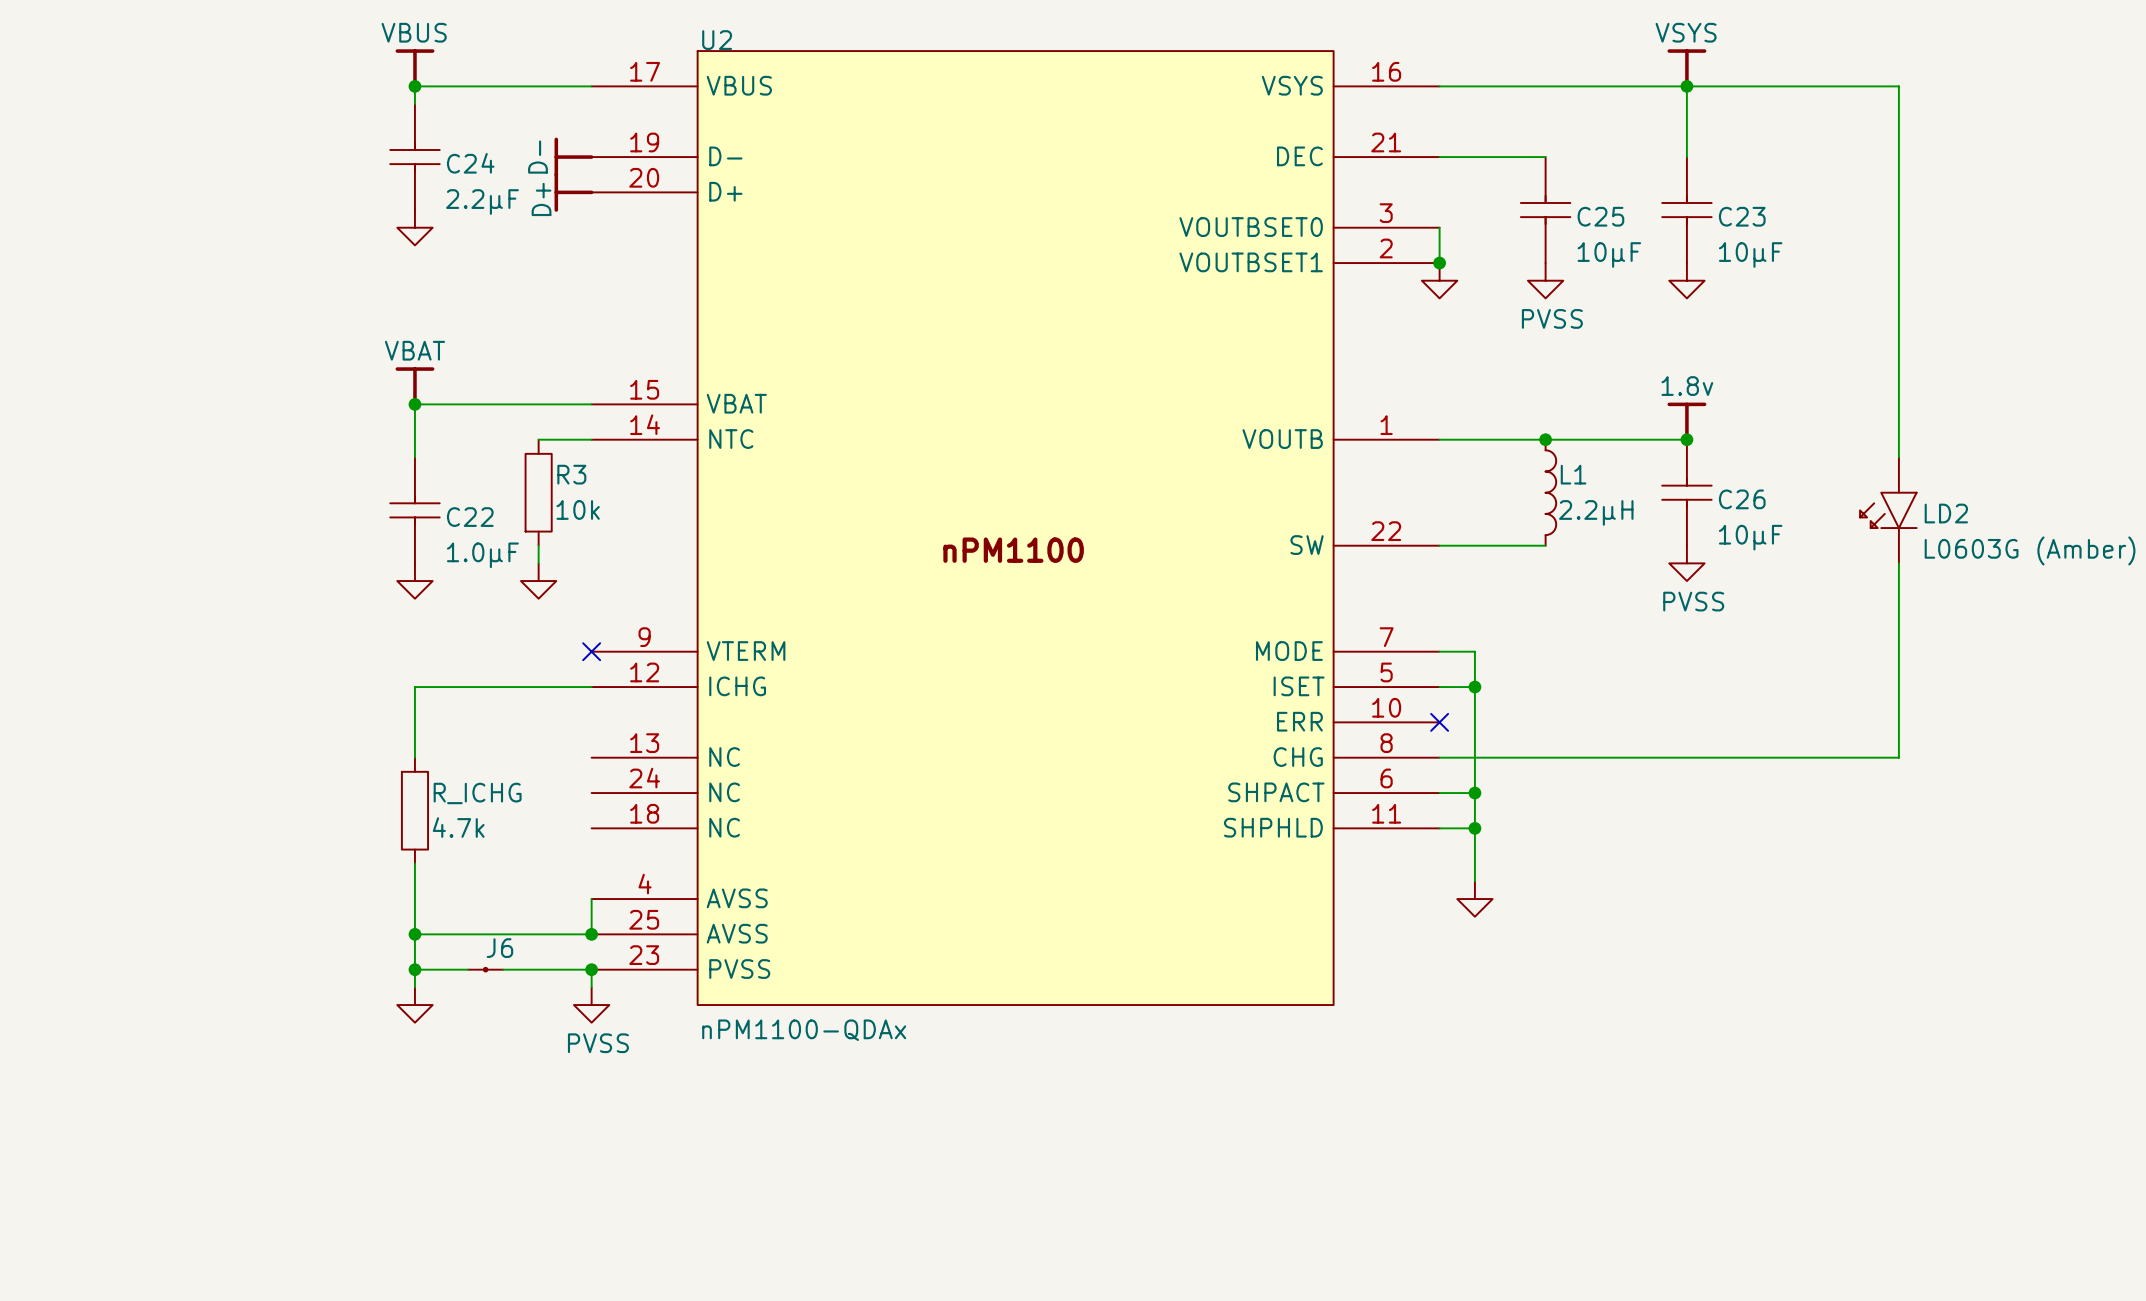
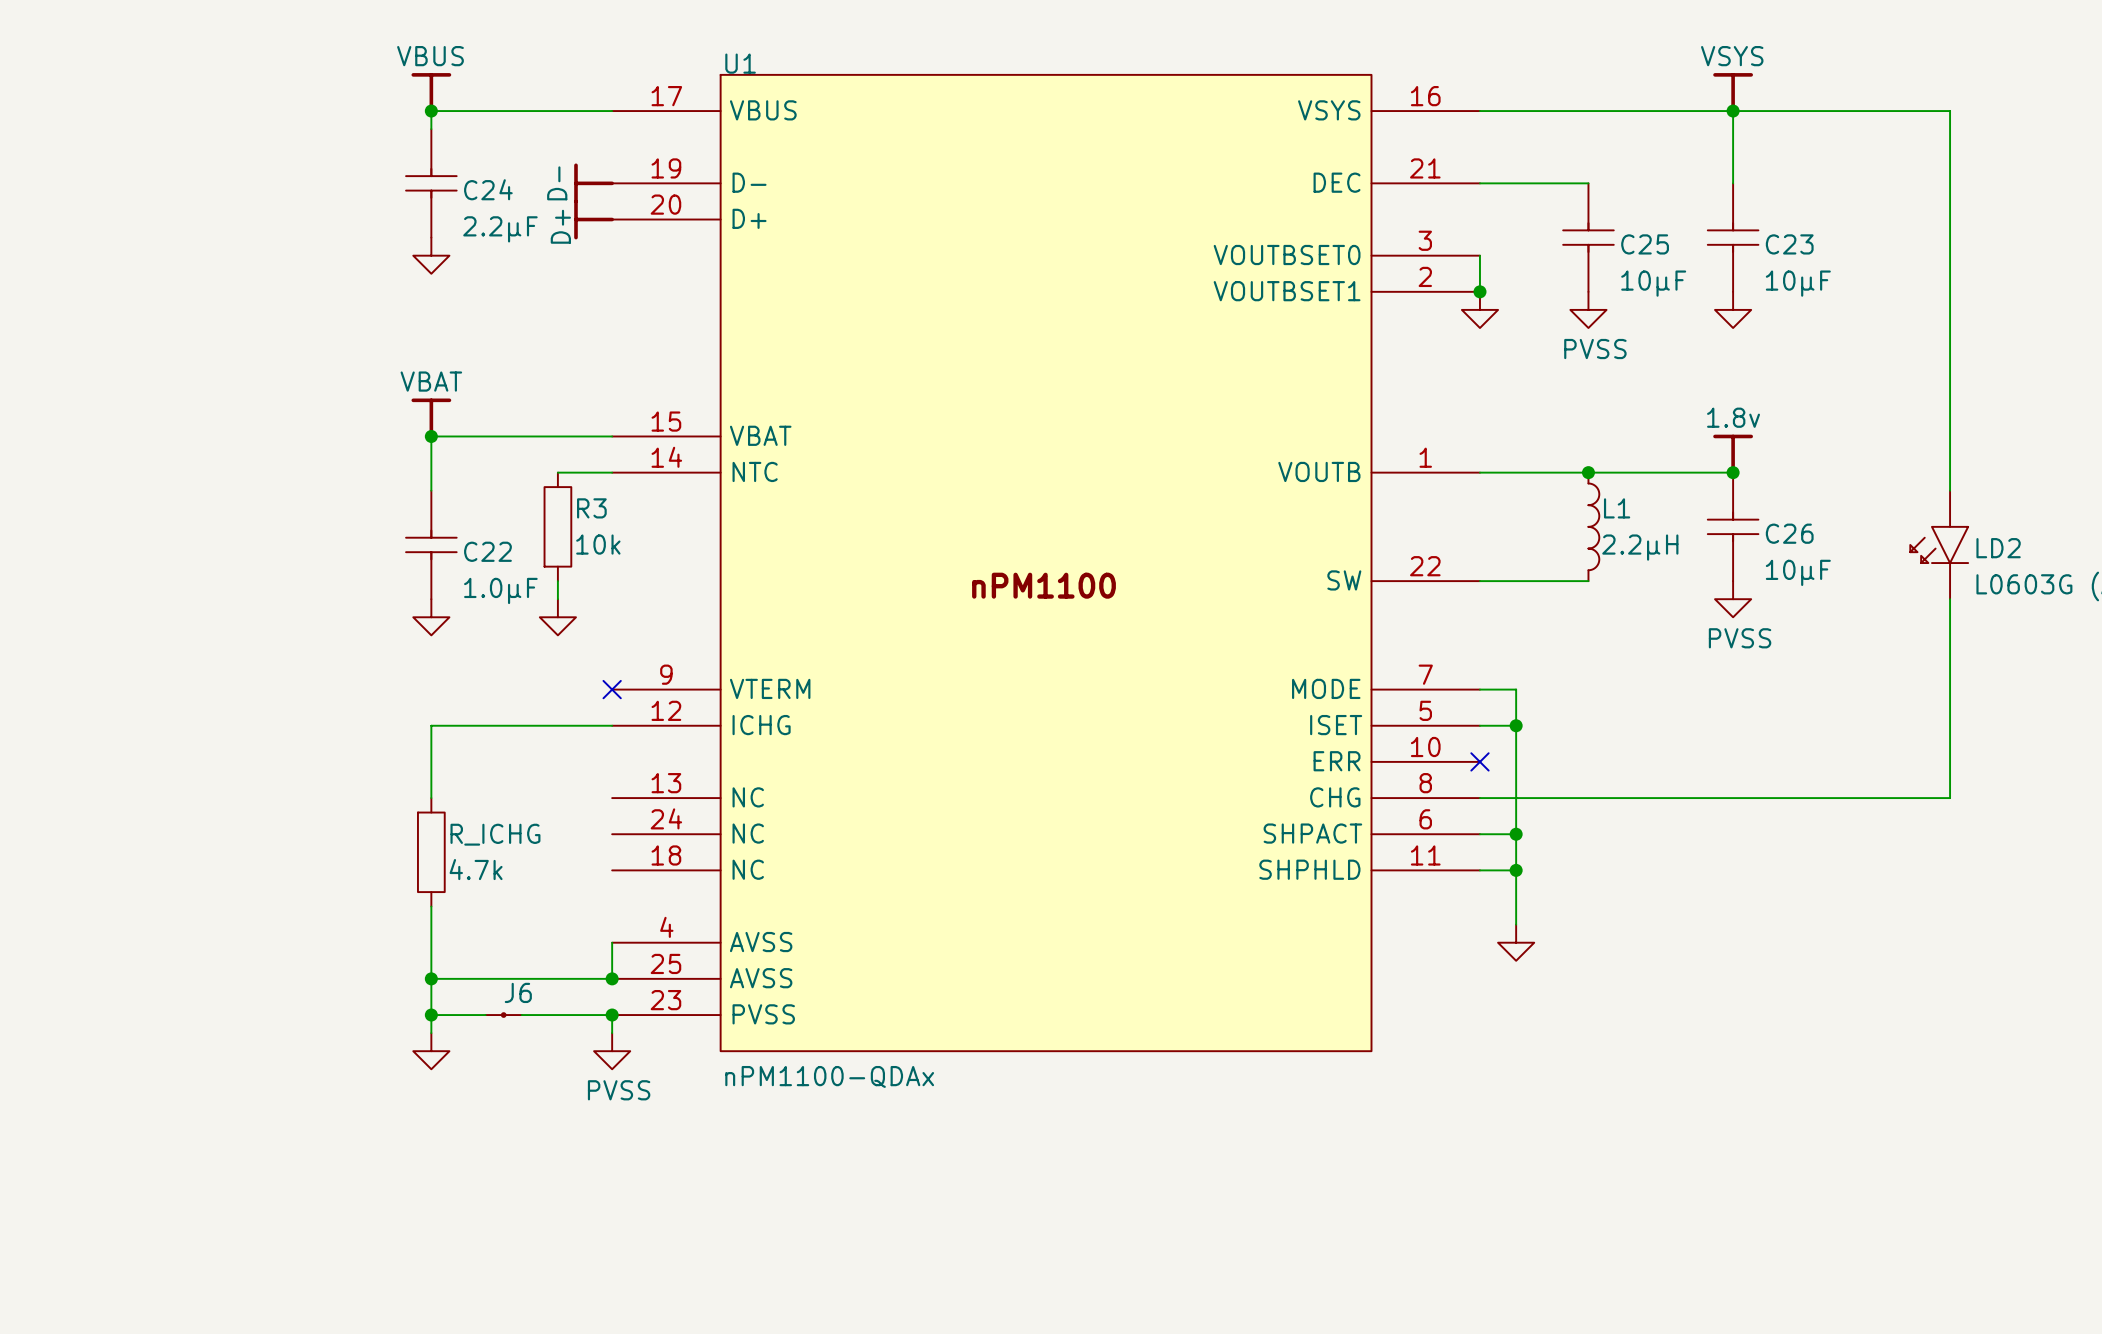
U2 name: U2 (717, 40) -> U1 (740, 63)

